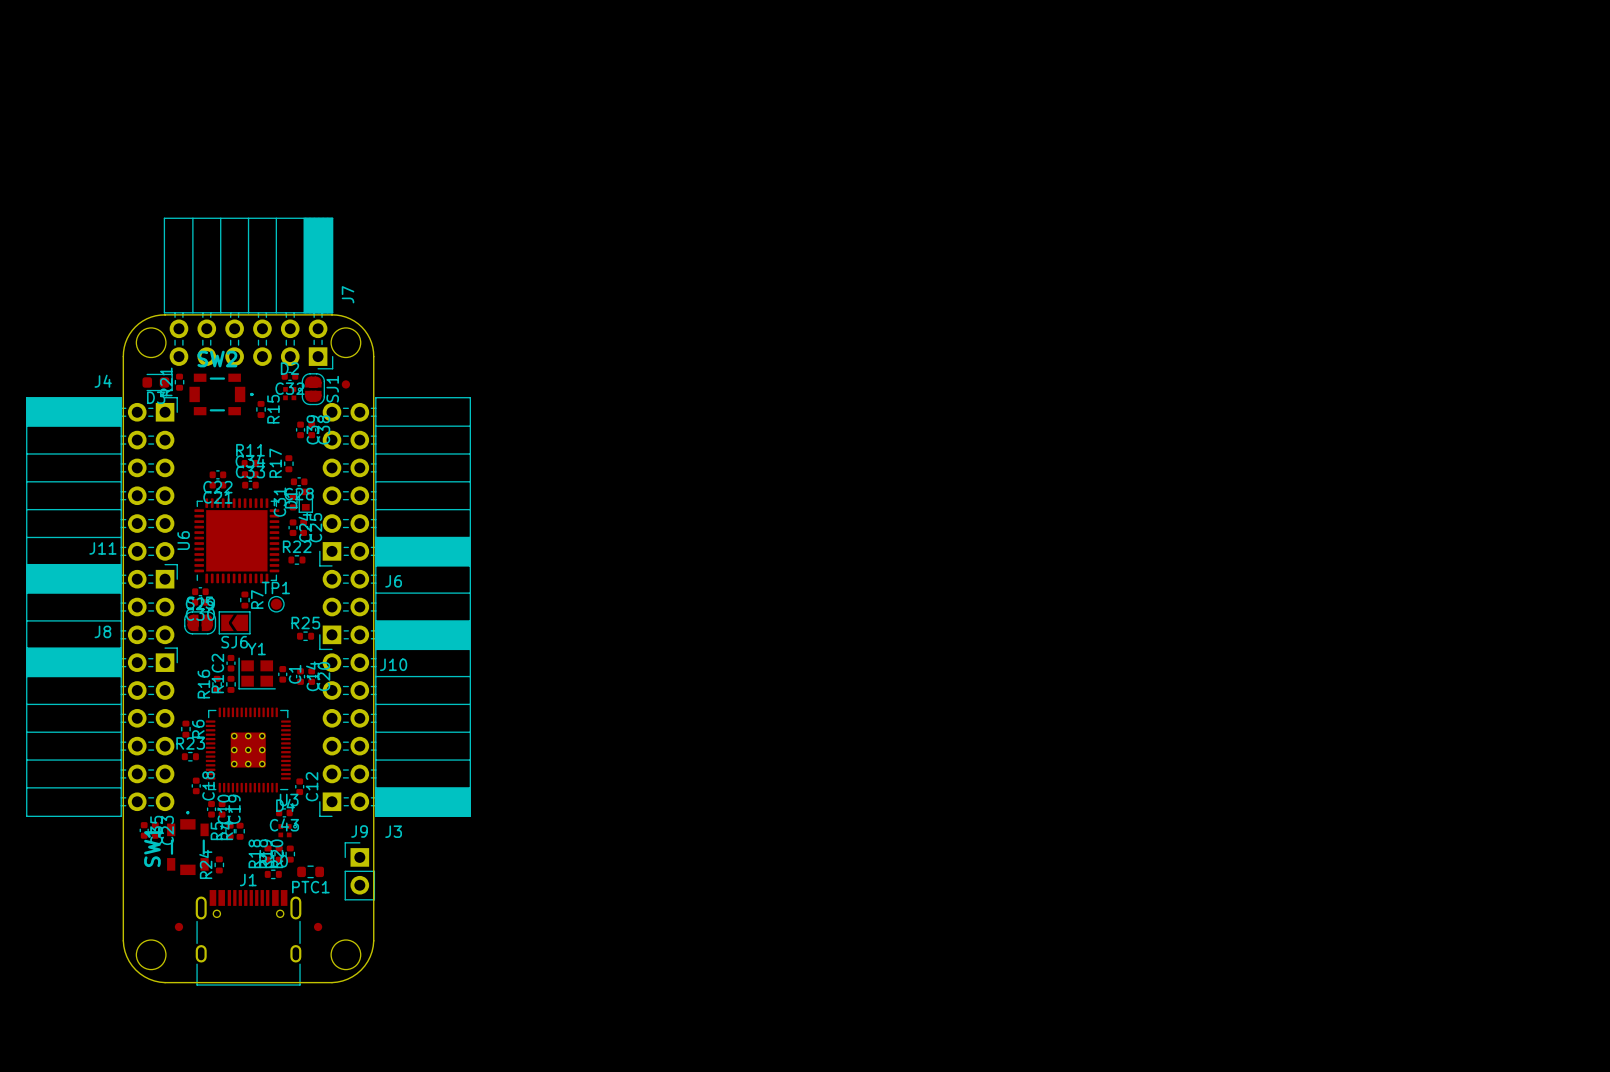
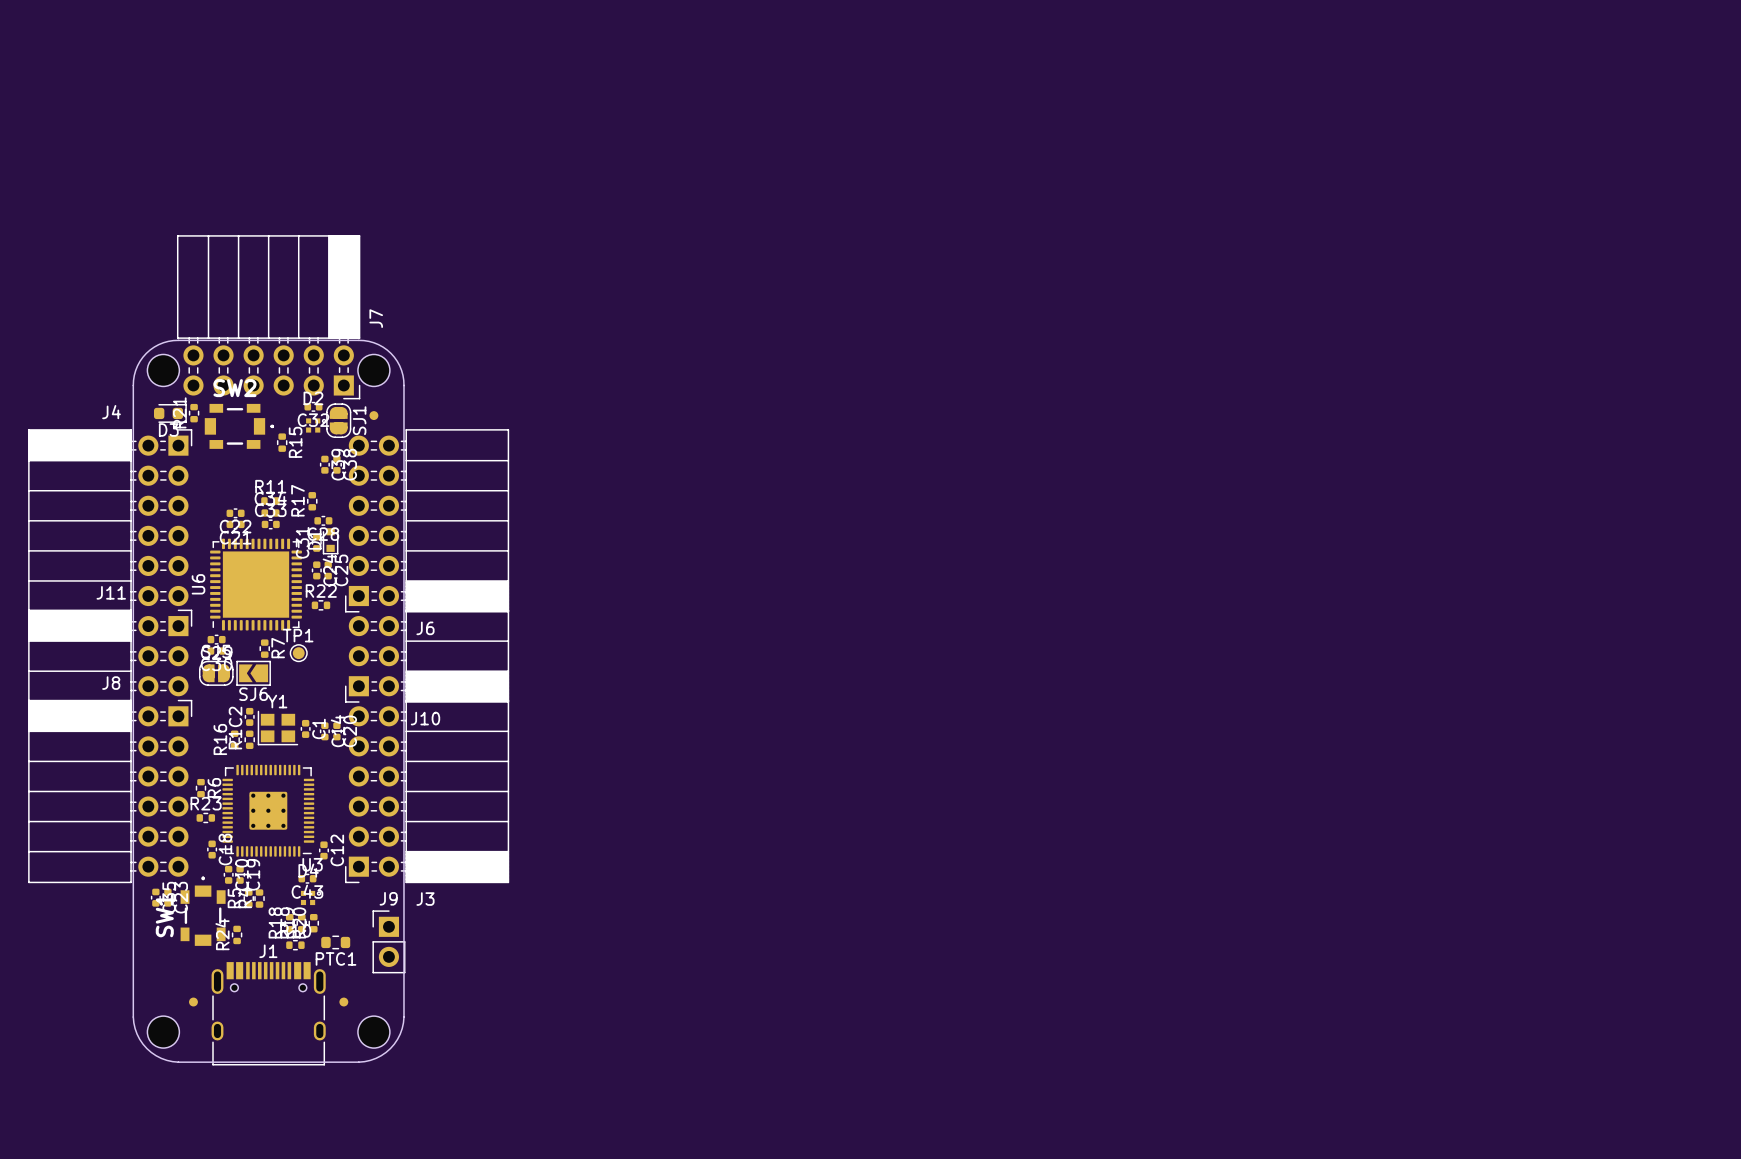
R25: (305, 636) -> none

